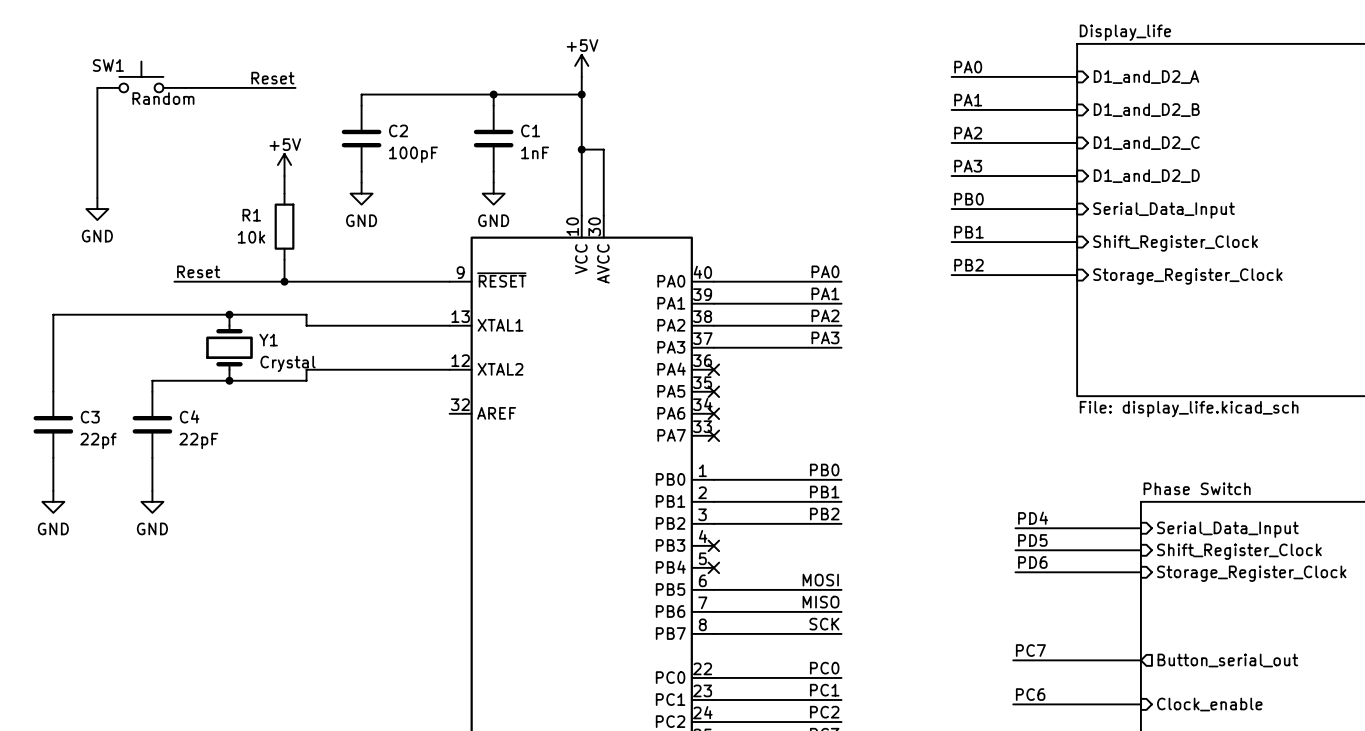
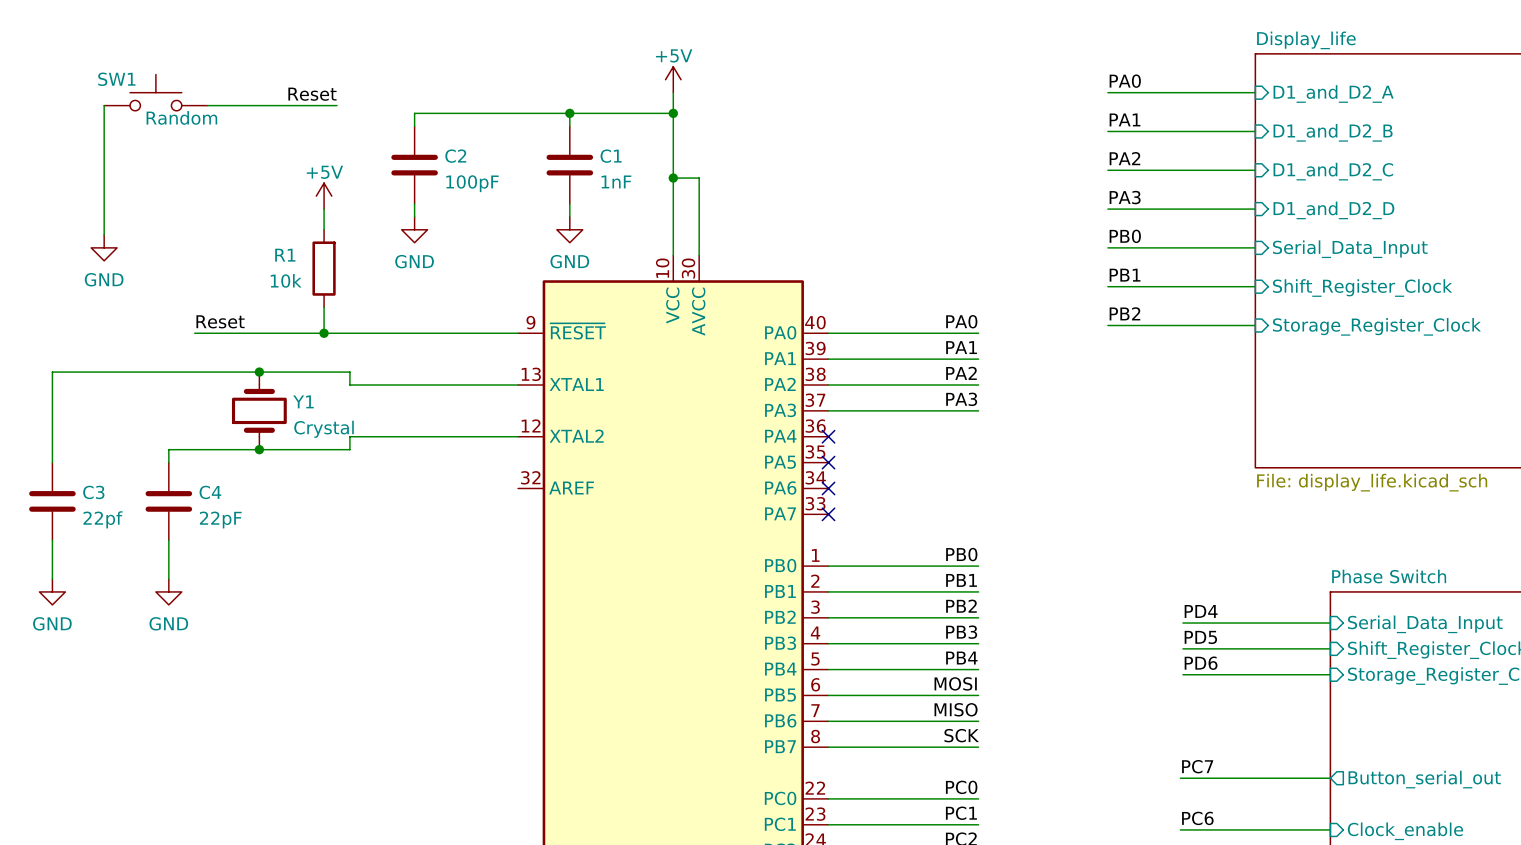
label: none -> PB3 (961, 632)
wire: none -> (828, 643) (978, 643)
no-connect mark: (713, 545) -> none
label: none -> PB4 (961, 658)
wire: none -> (828, 669) (978, 669)
no-connect mark: (713, 567) -> none

